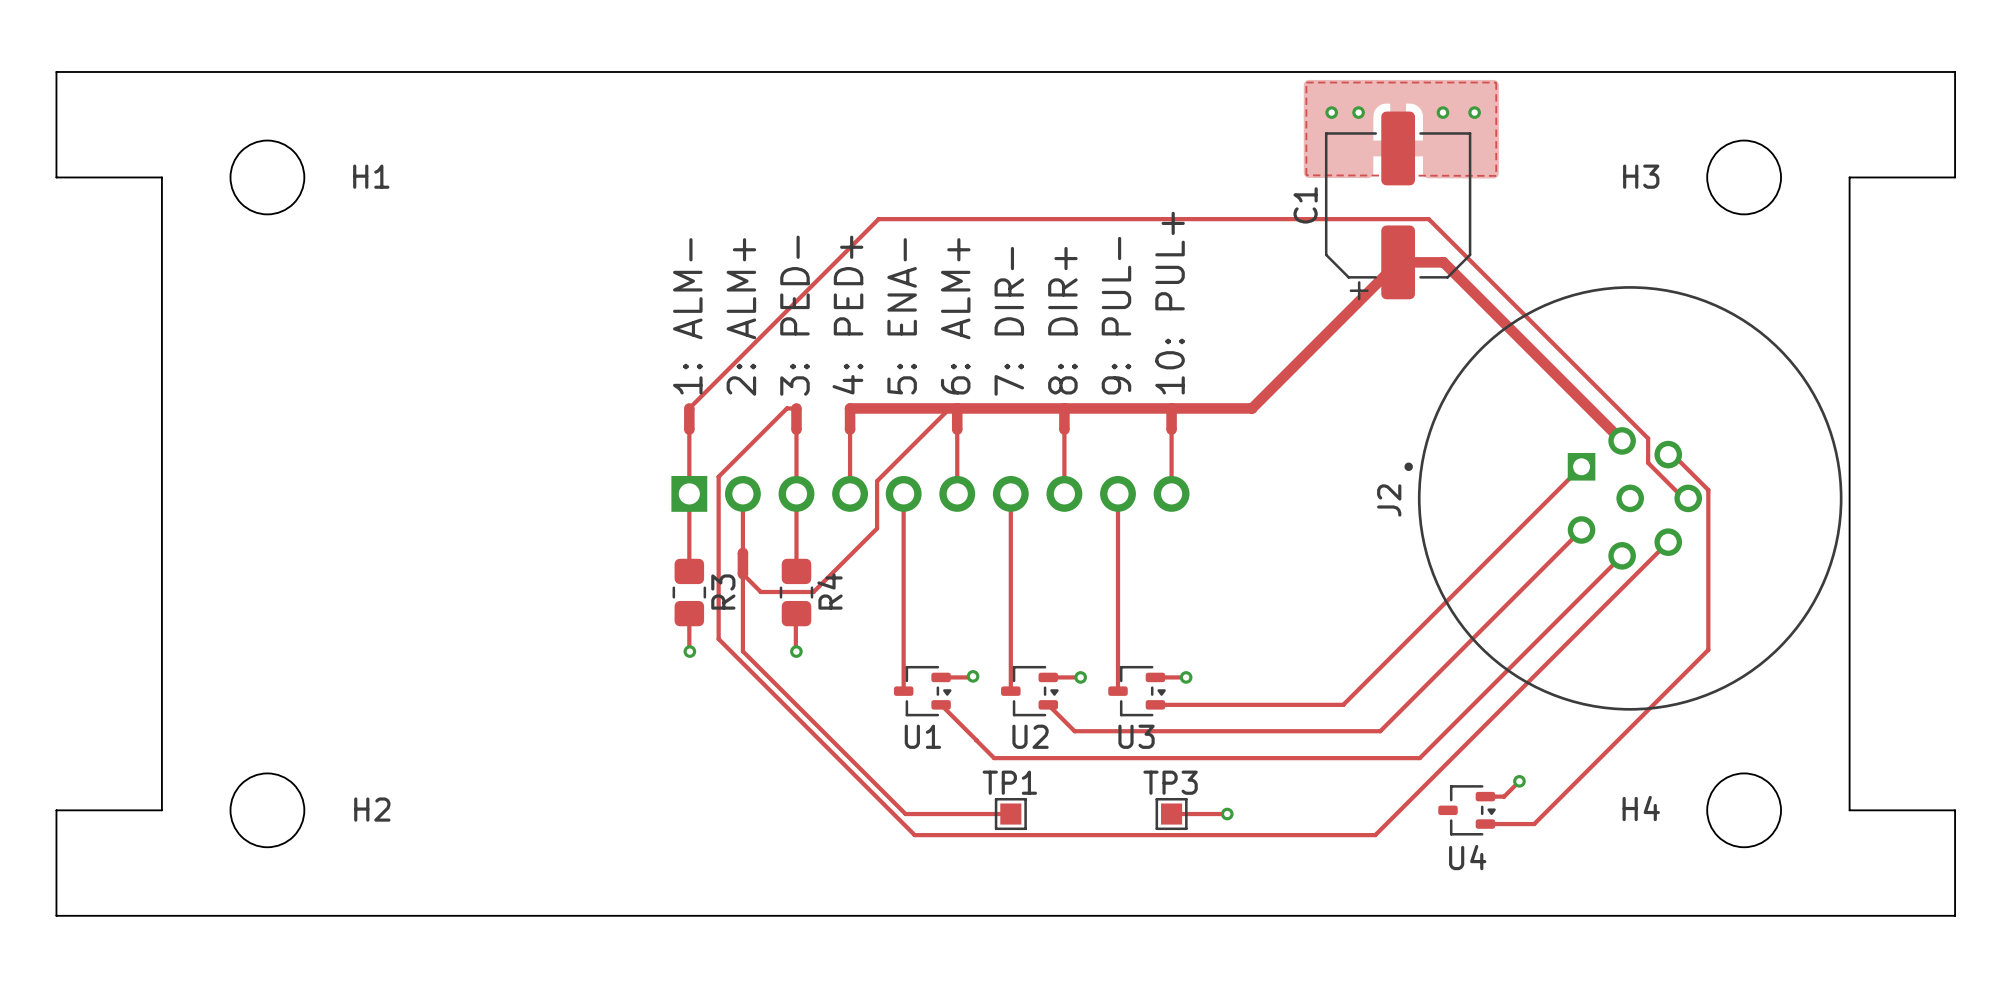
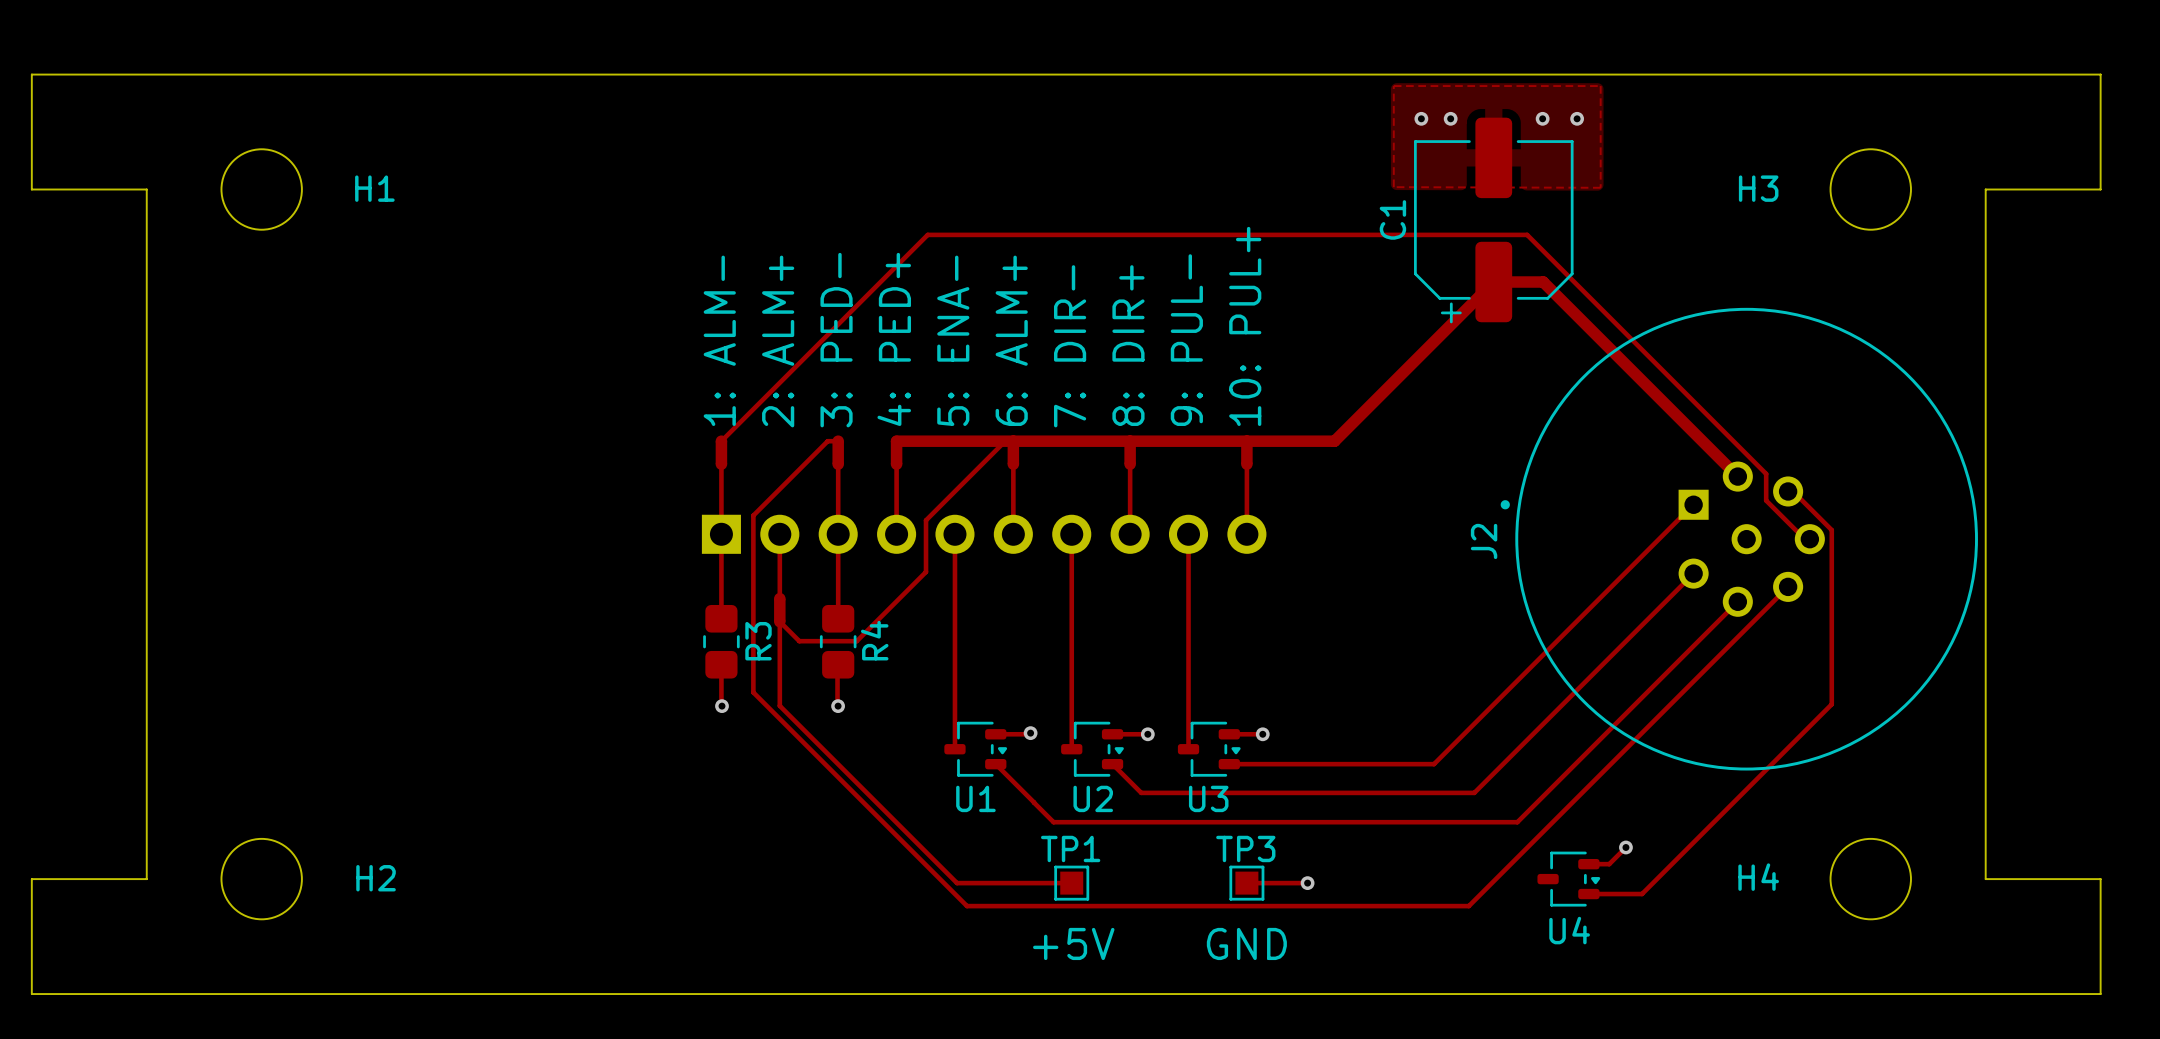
text: none -> +5V (1073, 943)
text: none -> GND (1246, 943)

